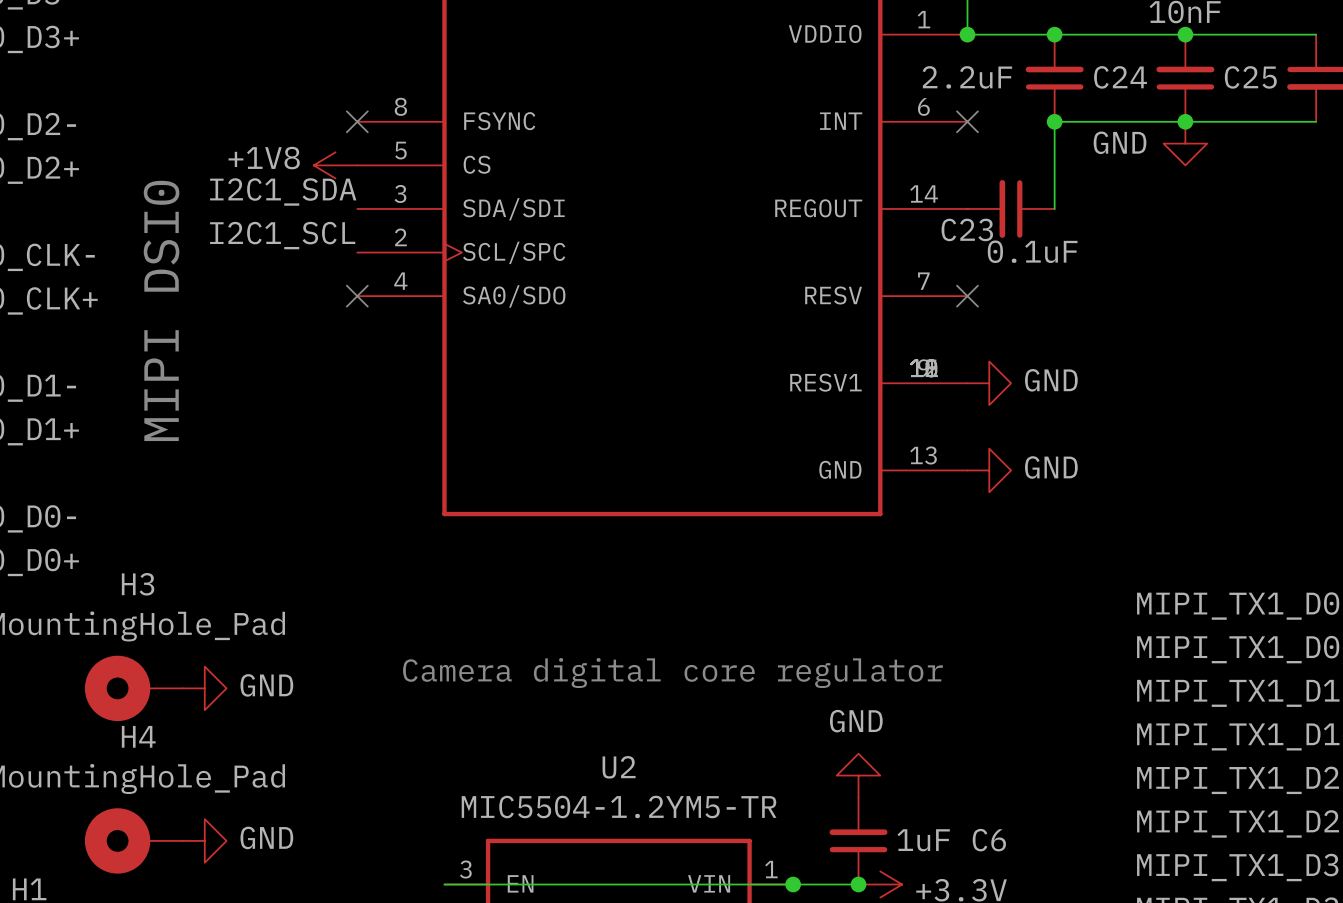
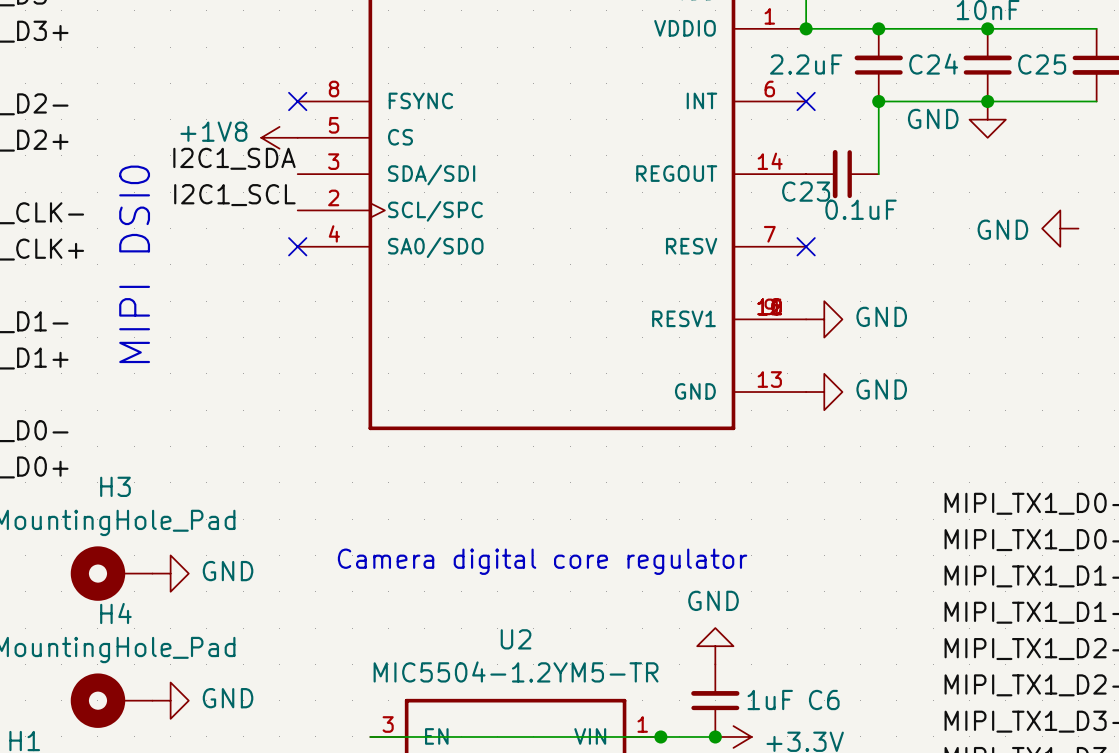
power symbol: none -> GND (1060, 228)

